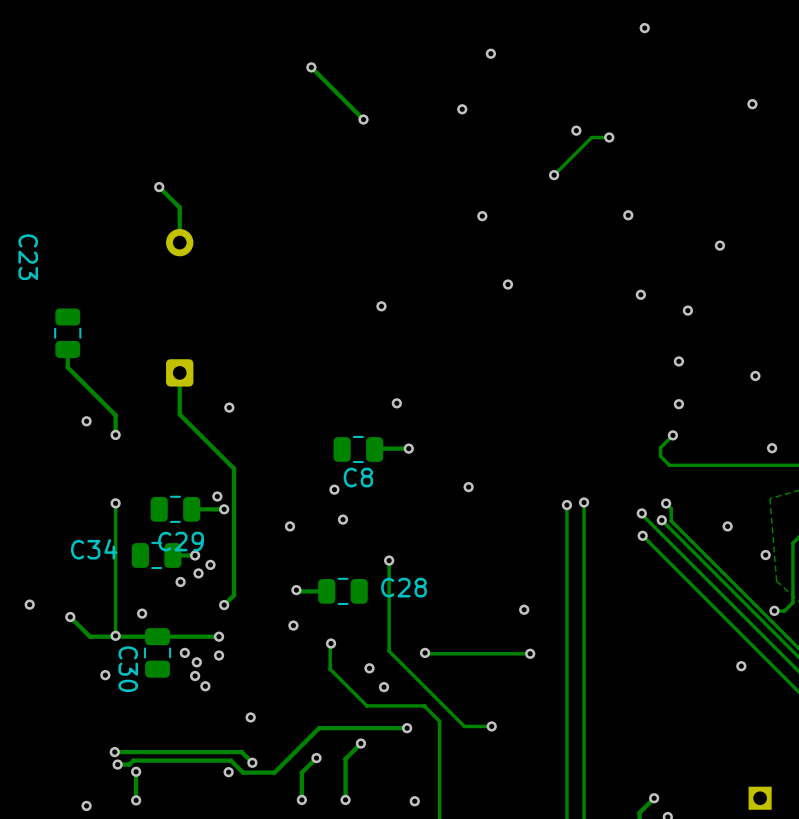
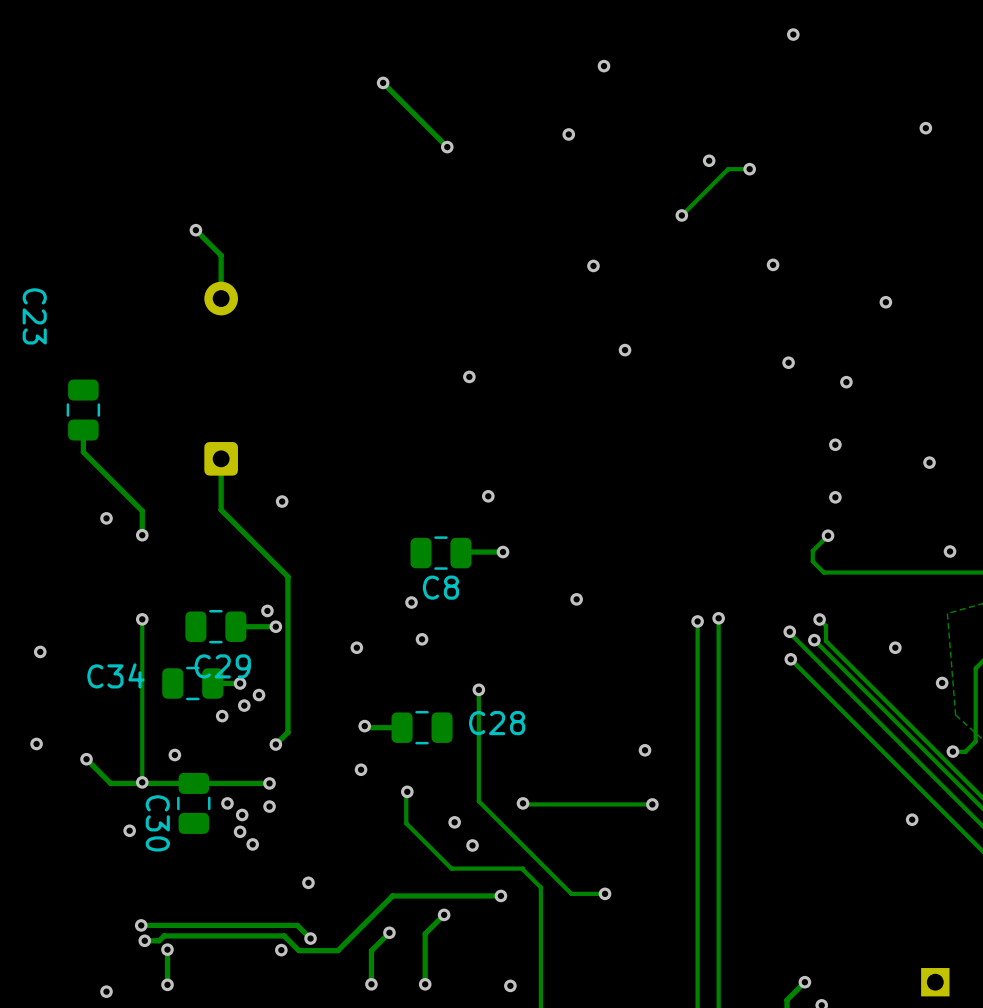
via: none -> (40, 651)

